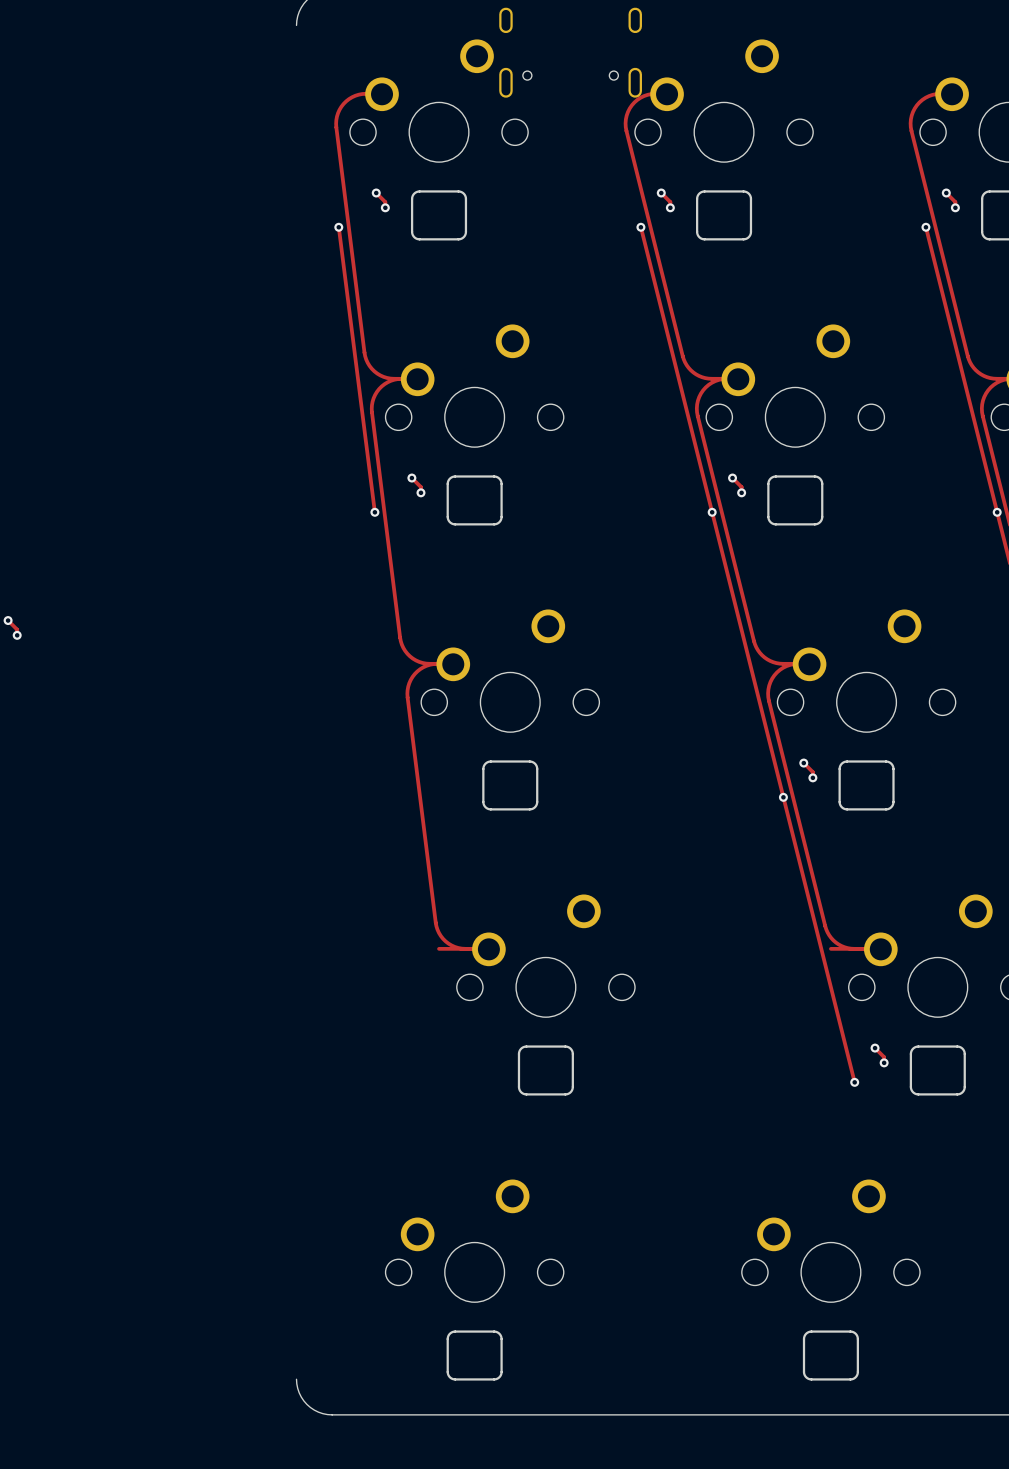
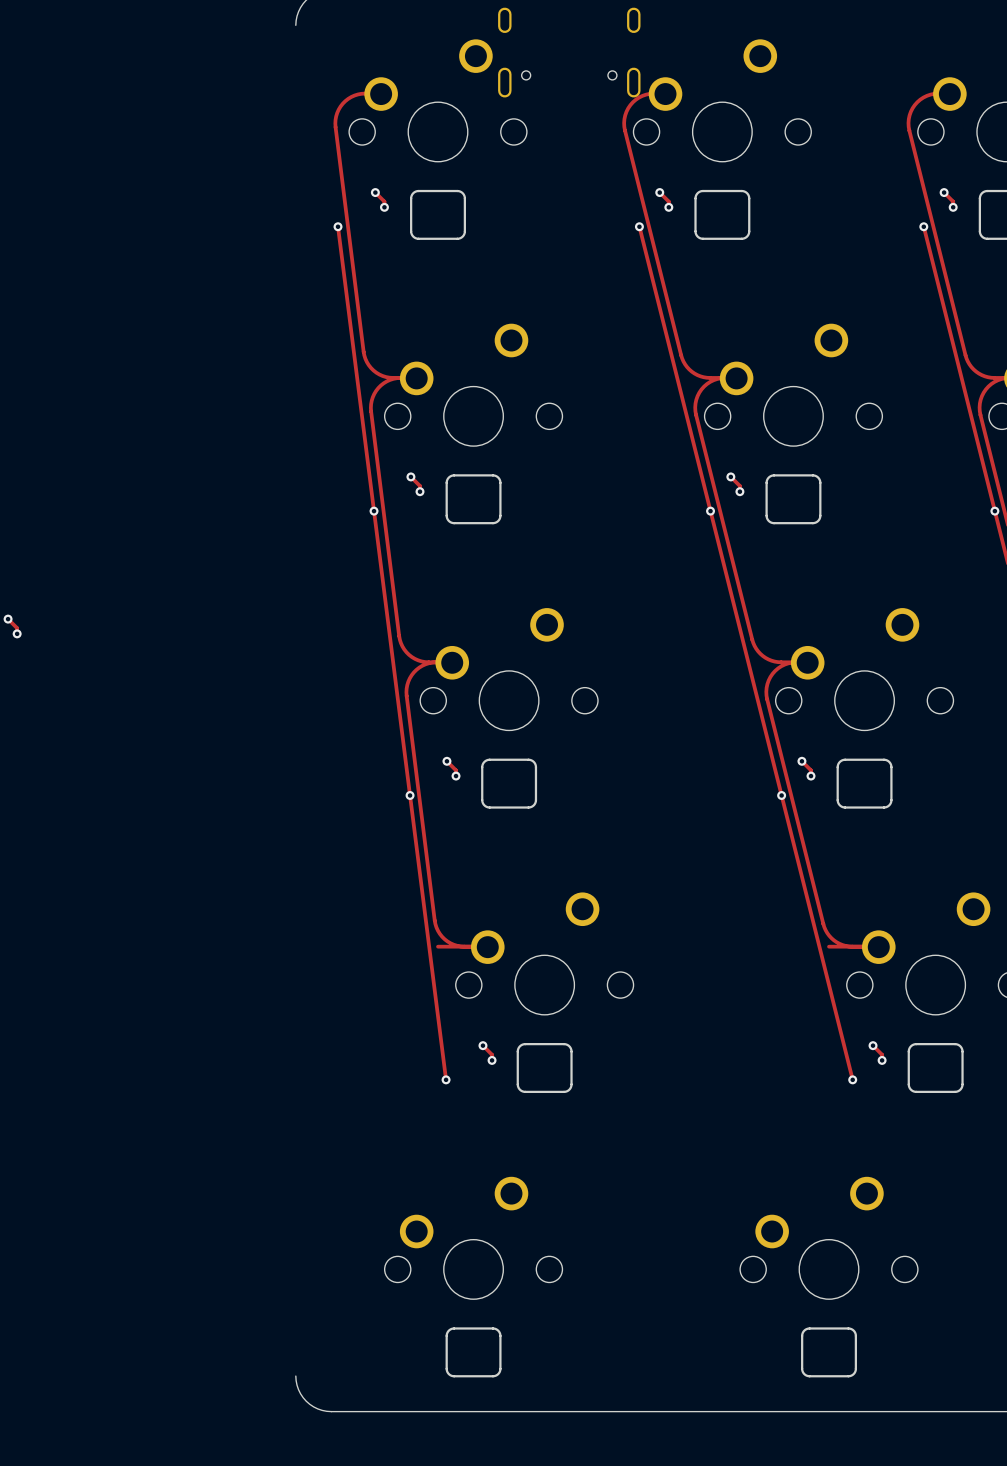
track: none -> (374, 511) (446, 1079)
track: none -> (446, 761) (456, 770) (456, 776)
via: none -> (446, 761)
via: none -> (456, 776)
via: none -> (410, 795)
track: none -> (482, 1045) (492, 1054) (492, 1060)
via: none -> (482, 1045)
via: none -> (492, 1060)
via: none -> (446, 1079)

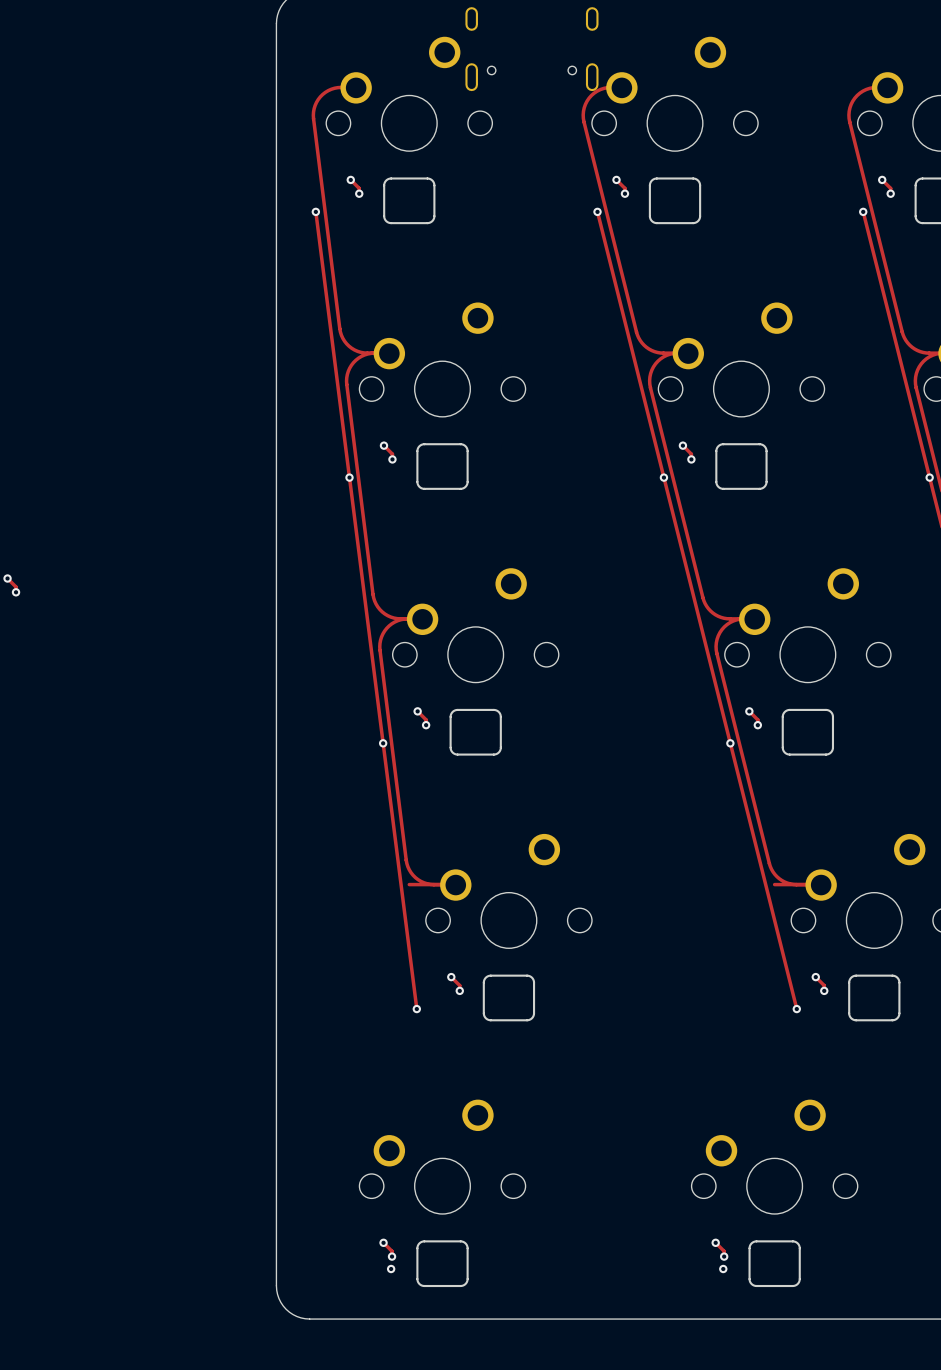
board edge: none -> (276, 23) (276, 1285)
track: none -> (383, 1242) (392, 1251) (392, 1256)
via: none -> (383, 1242)
track: none -> (715, 1242) (724, 1251) (724, 1256)
via: none -> (715, 1242)
via: none -> (392, 1256)
via: none -> (724, 1256)
via: none -> (391, 1269)
via: none -> (723, 1269)

